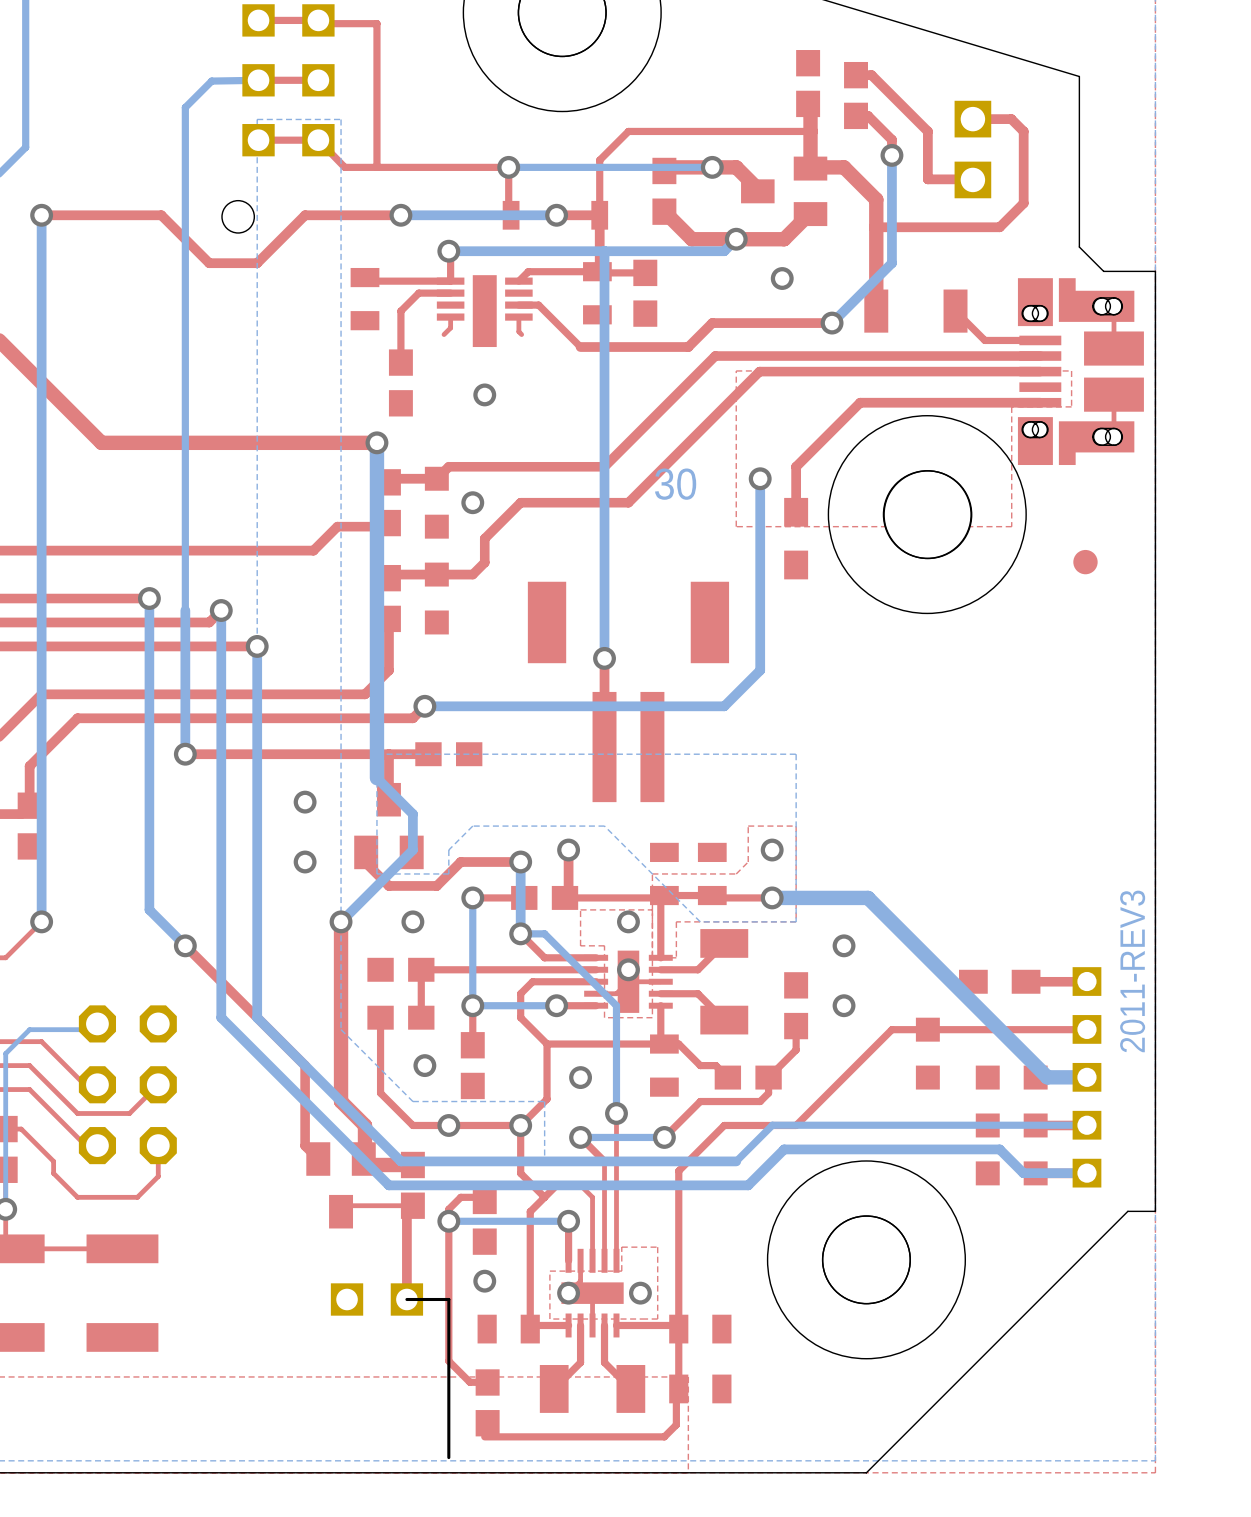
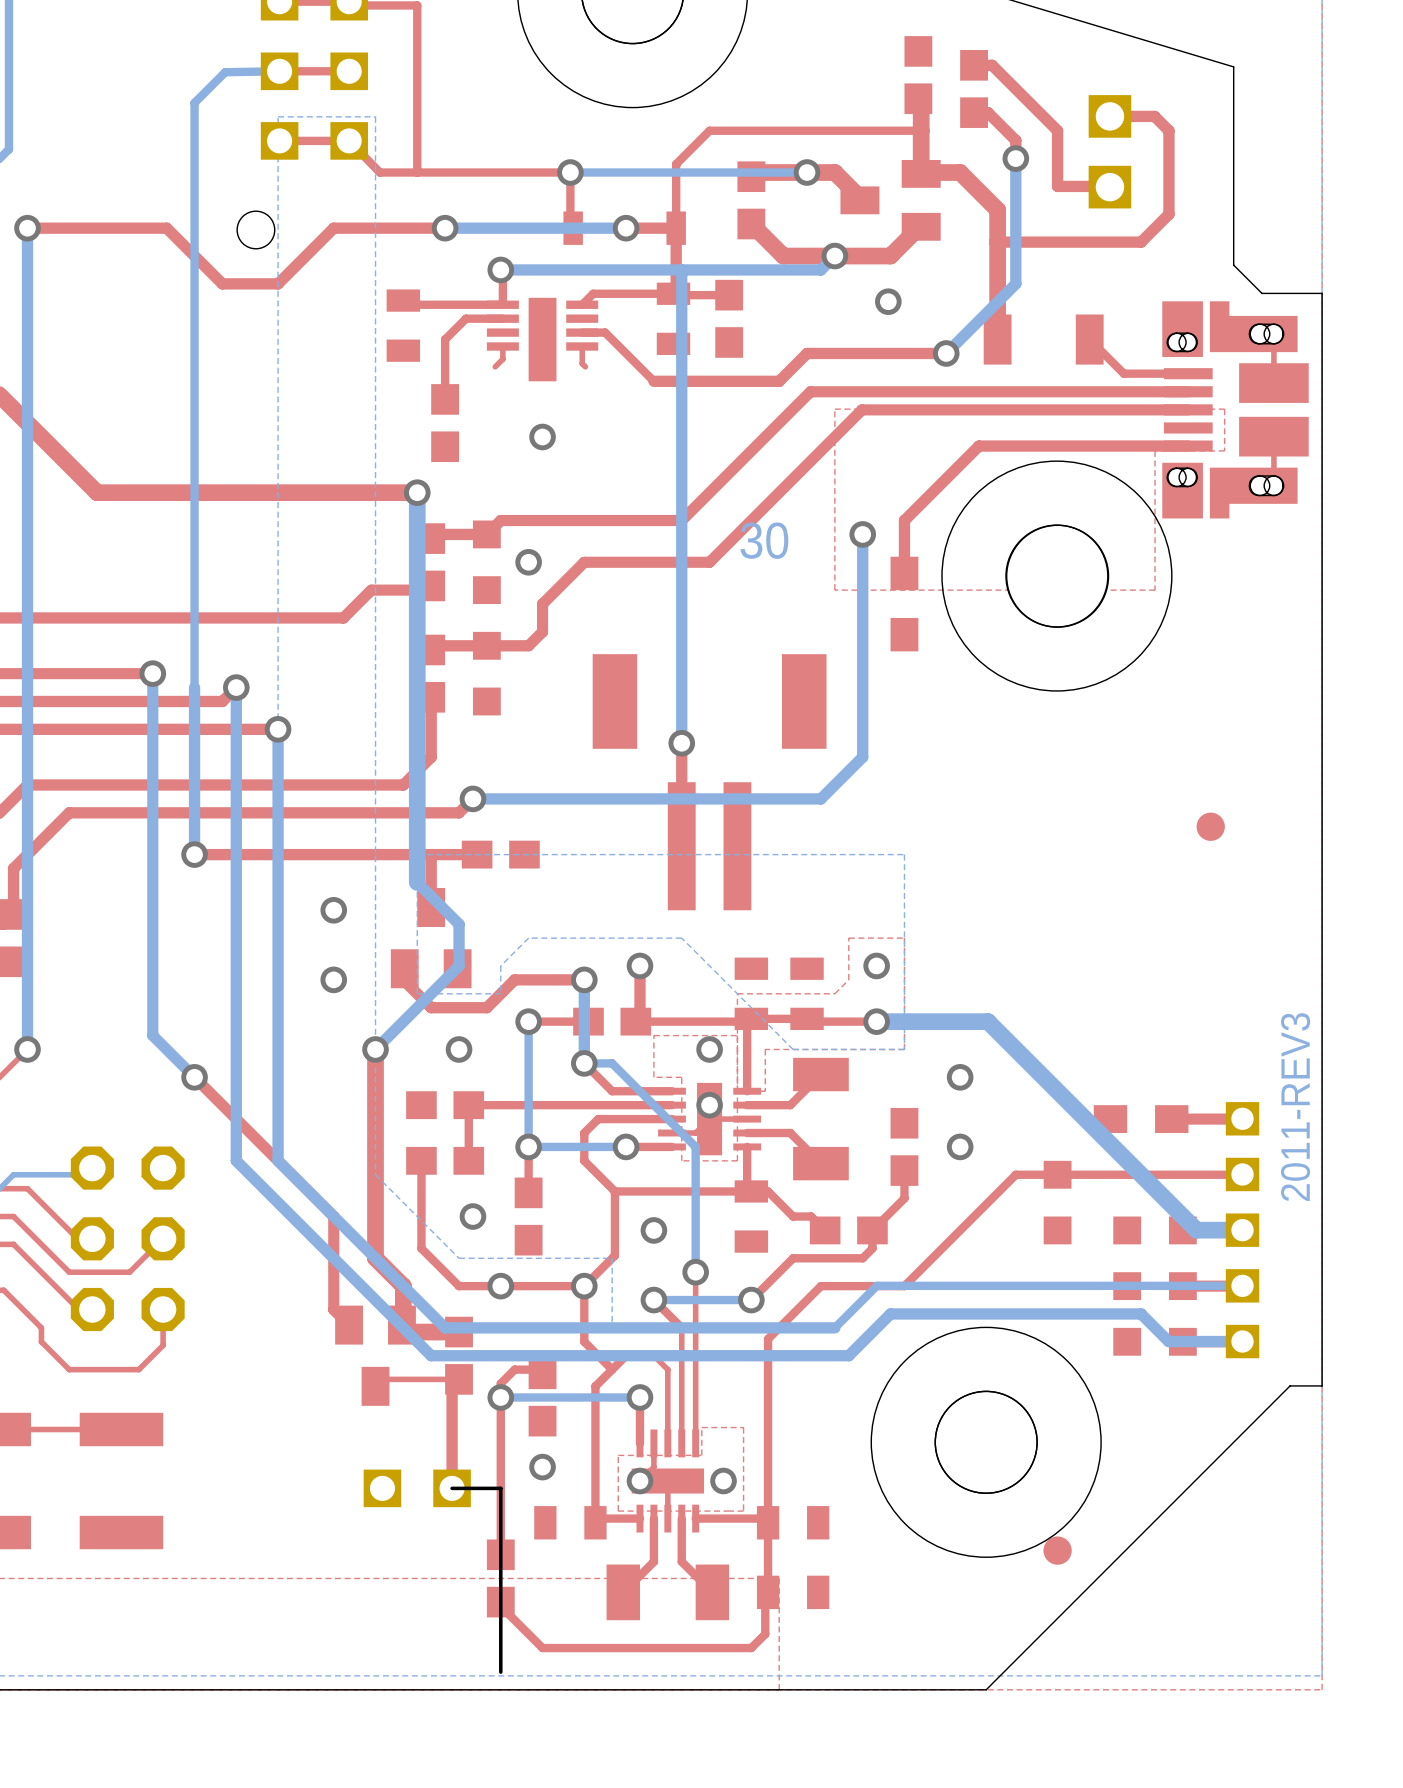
part position: (1085, 562) -> (1210, 826)
part: none -> (1057, 1550)
top track: (448, 1356) (448, 1361) (469, 1382) (487, 1382) -> none
top track: none -> (500, 1602) (500, 1606) (542, 1648)
part position: (487, 1402) -> (500, 1578)

